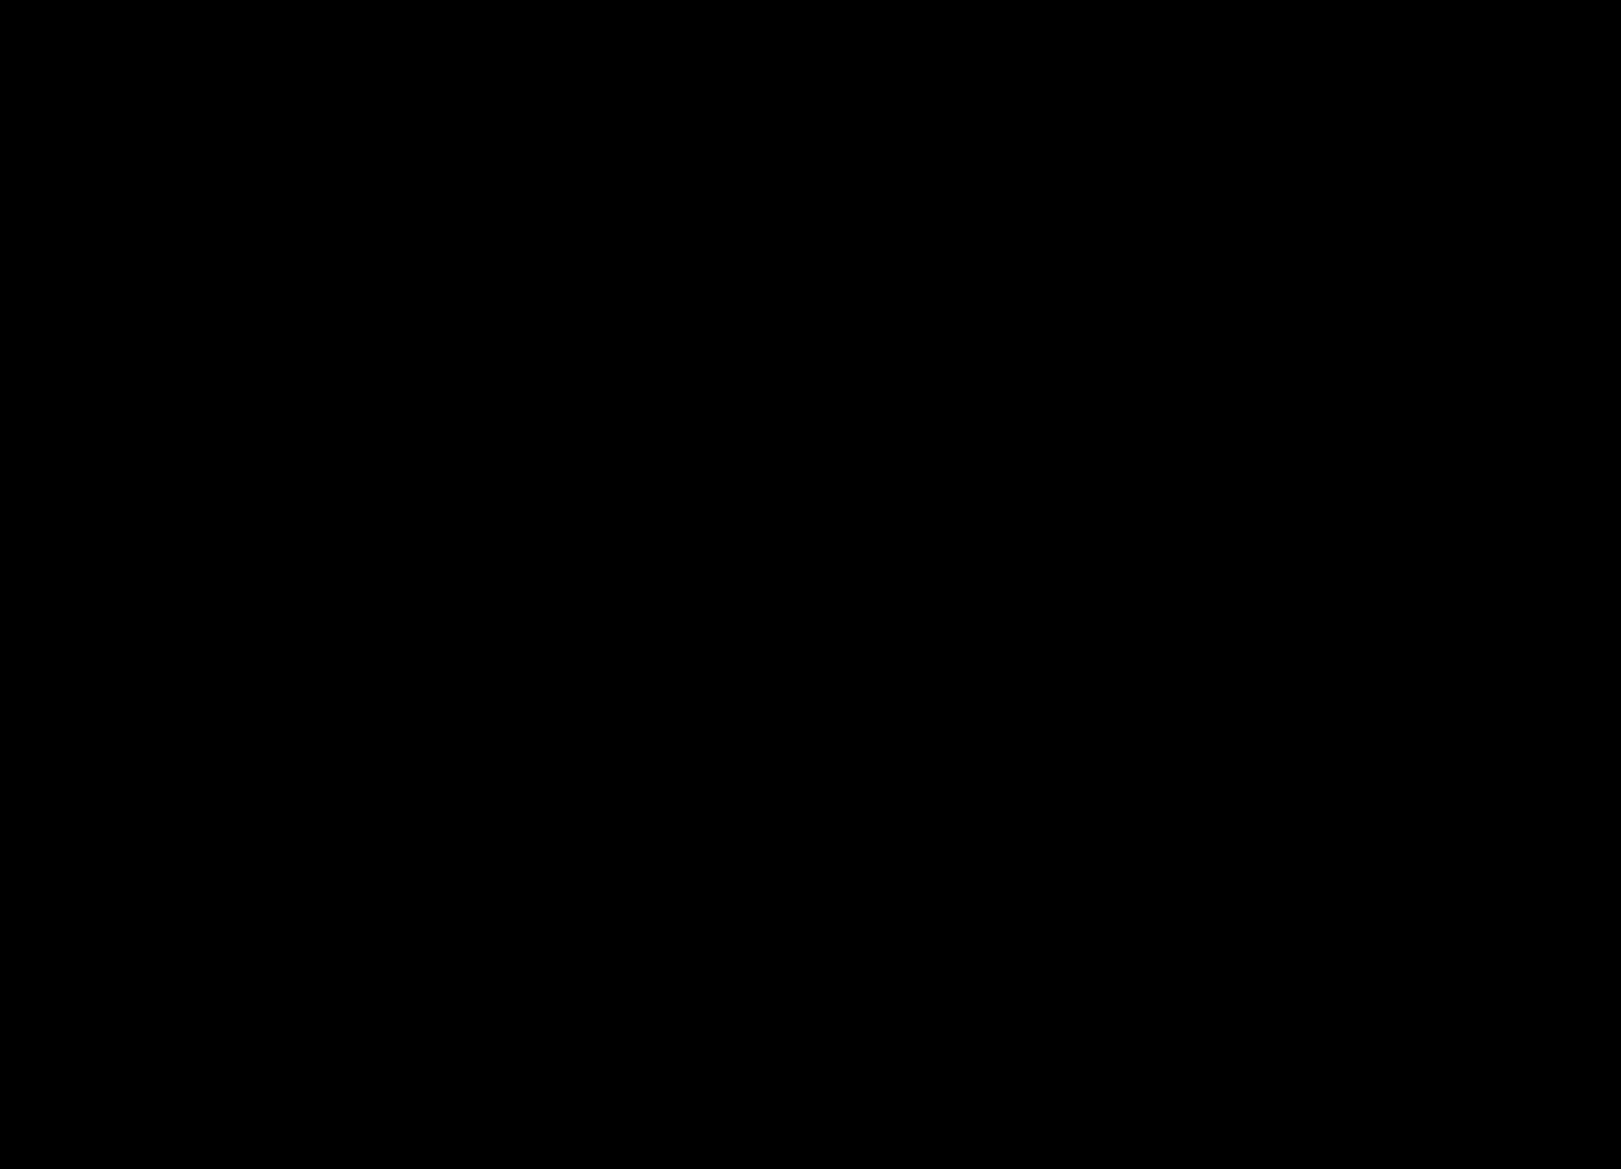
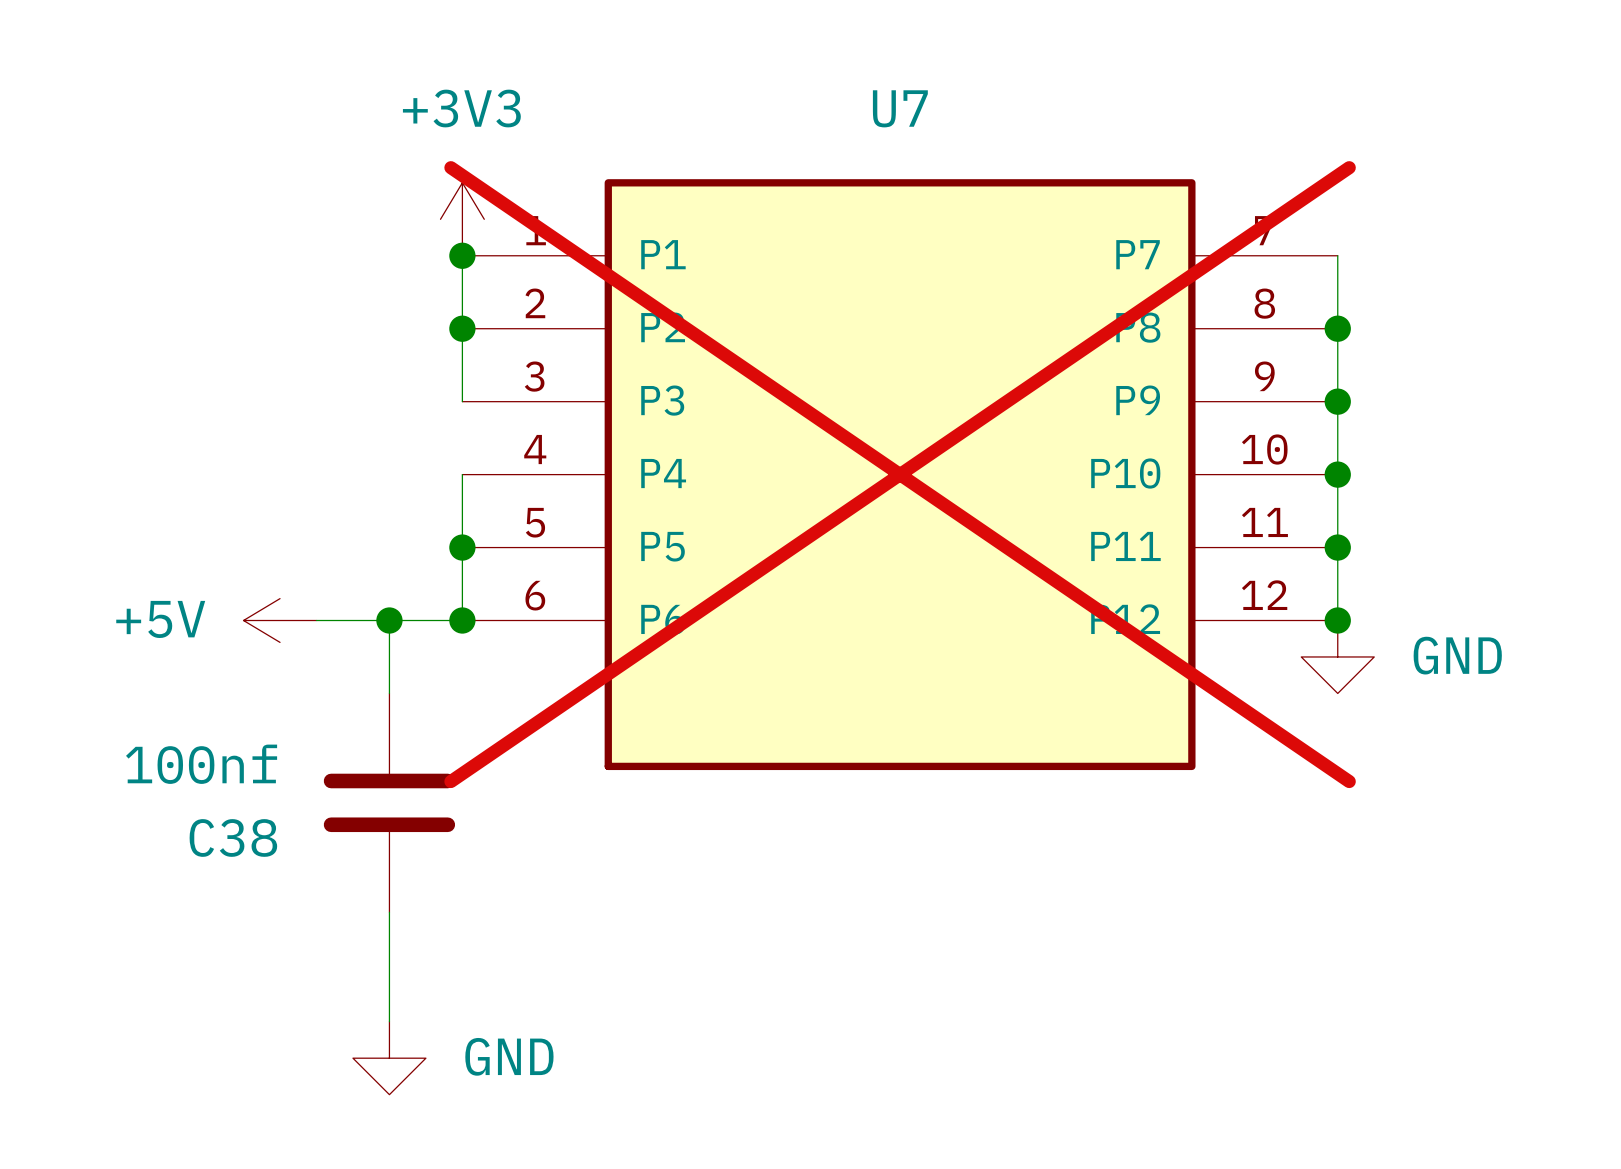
power symbol: none -> +3V3 (462, 219)
wire: none -> (462, 255) (462, 401)
junction: none -> (462, 255)
wire: none -> (1337, 255) (1337, 620)
junction: none -> (462, 328)
junction: none -> (1337, 328)
junction: none -> (1337, 401)
wire: none -> (462, 474) (462, 620) (316, 620)
U7: none -> (900, 474)
junction: none -> (1337, 474)
junction: none -> (462, 547)
junction: none -> (1337, 547)
power symbol: none -> +5V (280, 620)
wire: none -> (389, 620) (389, 693)
junction: none -> (389, 620)
junction: none -> (462, 620)
junction: none -> (1337, 620)
power symbol: none -> GND (1337, 656)
C38: none -> 100nf (389, 802)
wire: none -> (389, 912) (389, 1021)
power symbol: none -> GND (389, 1058)

